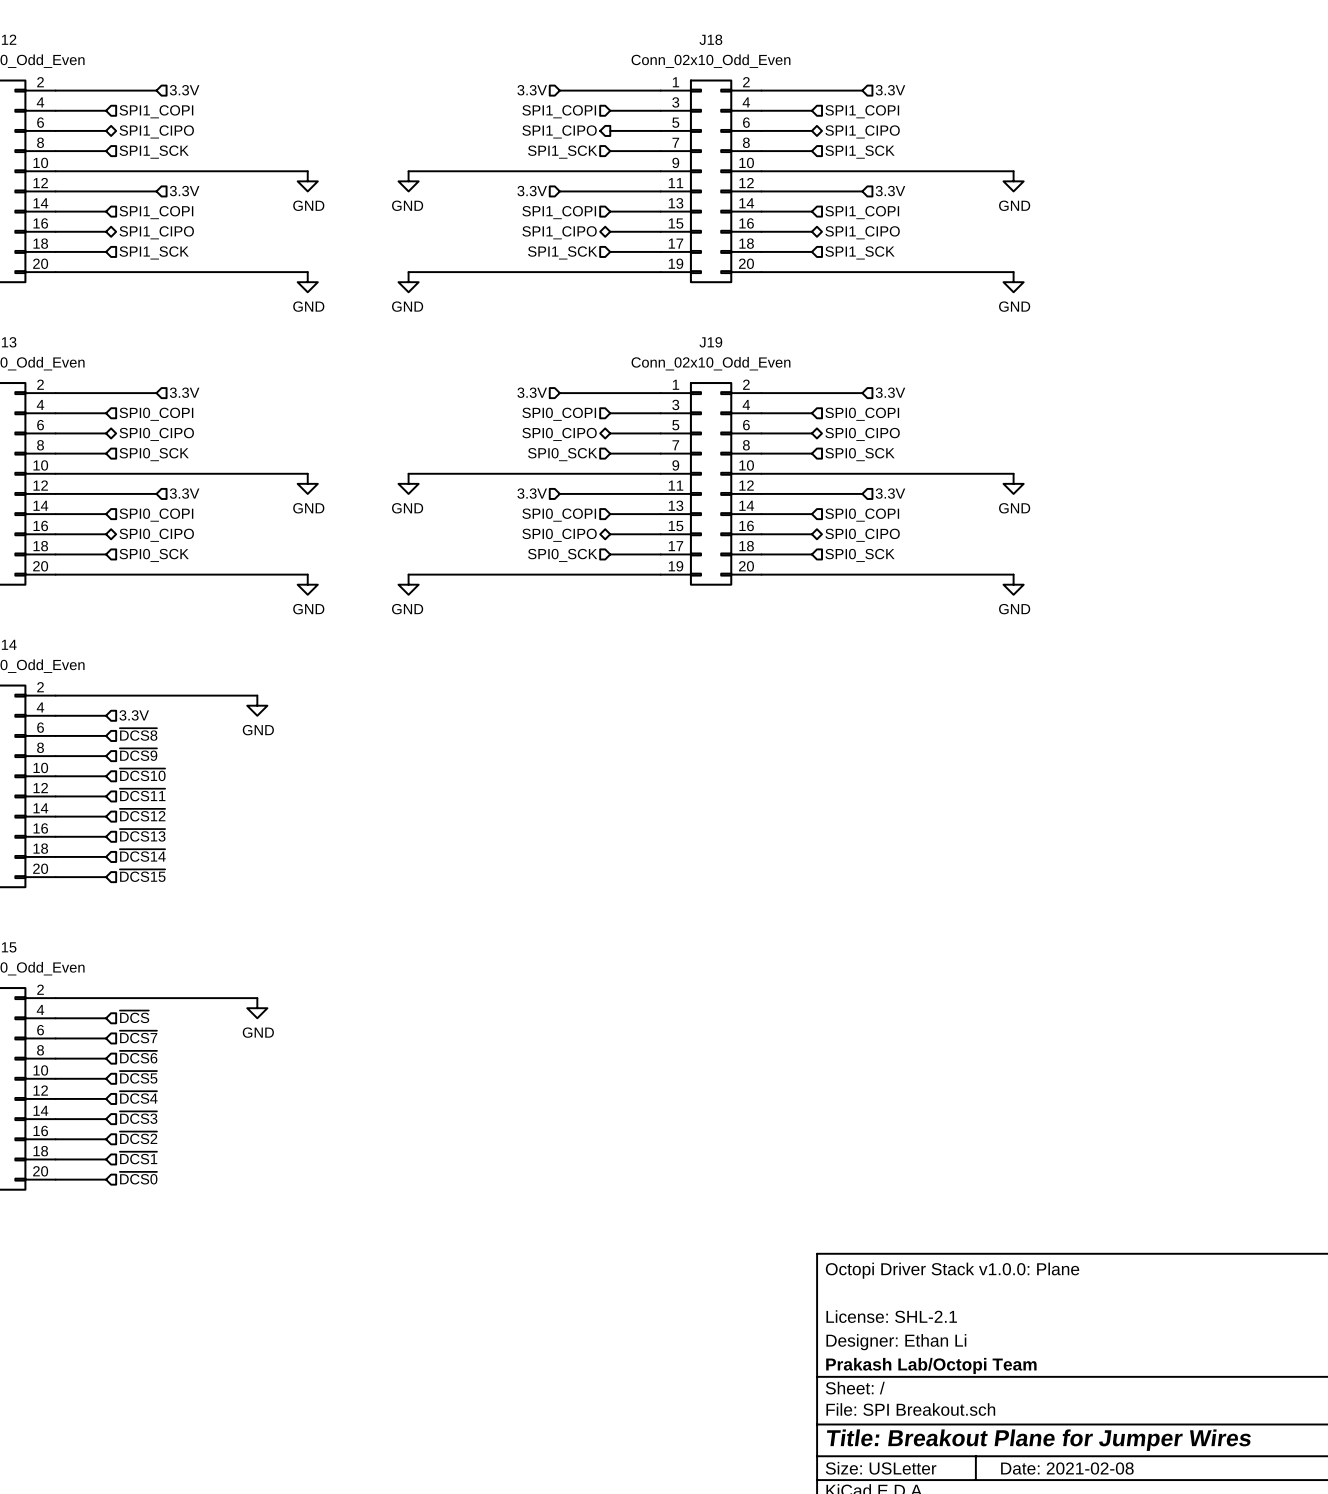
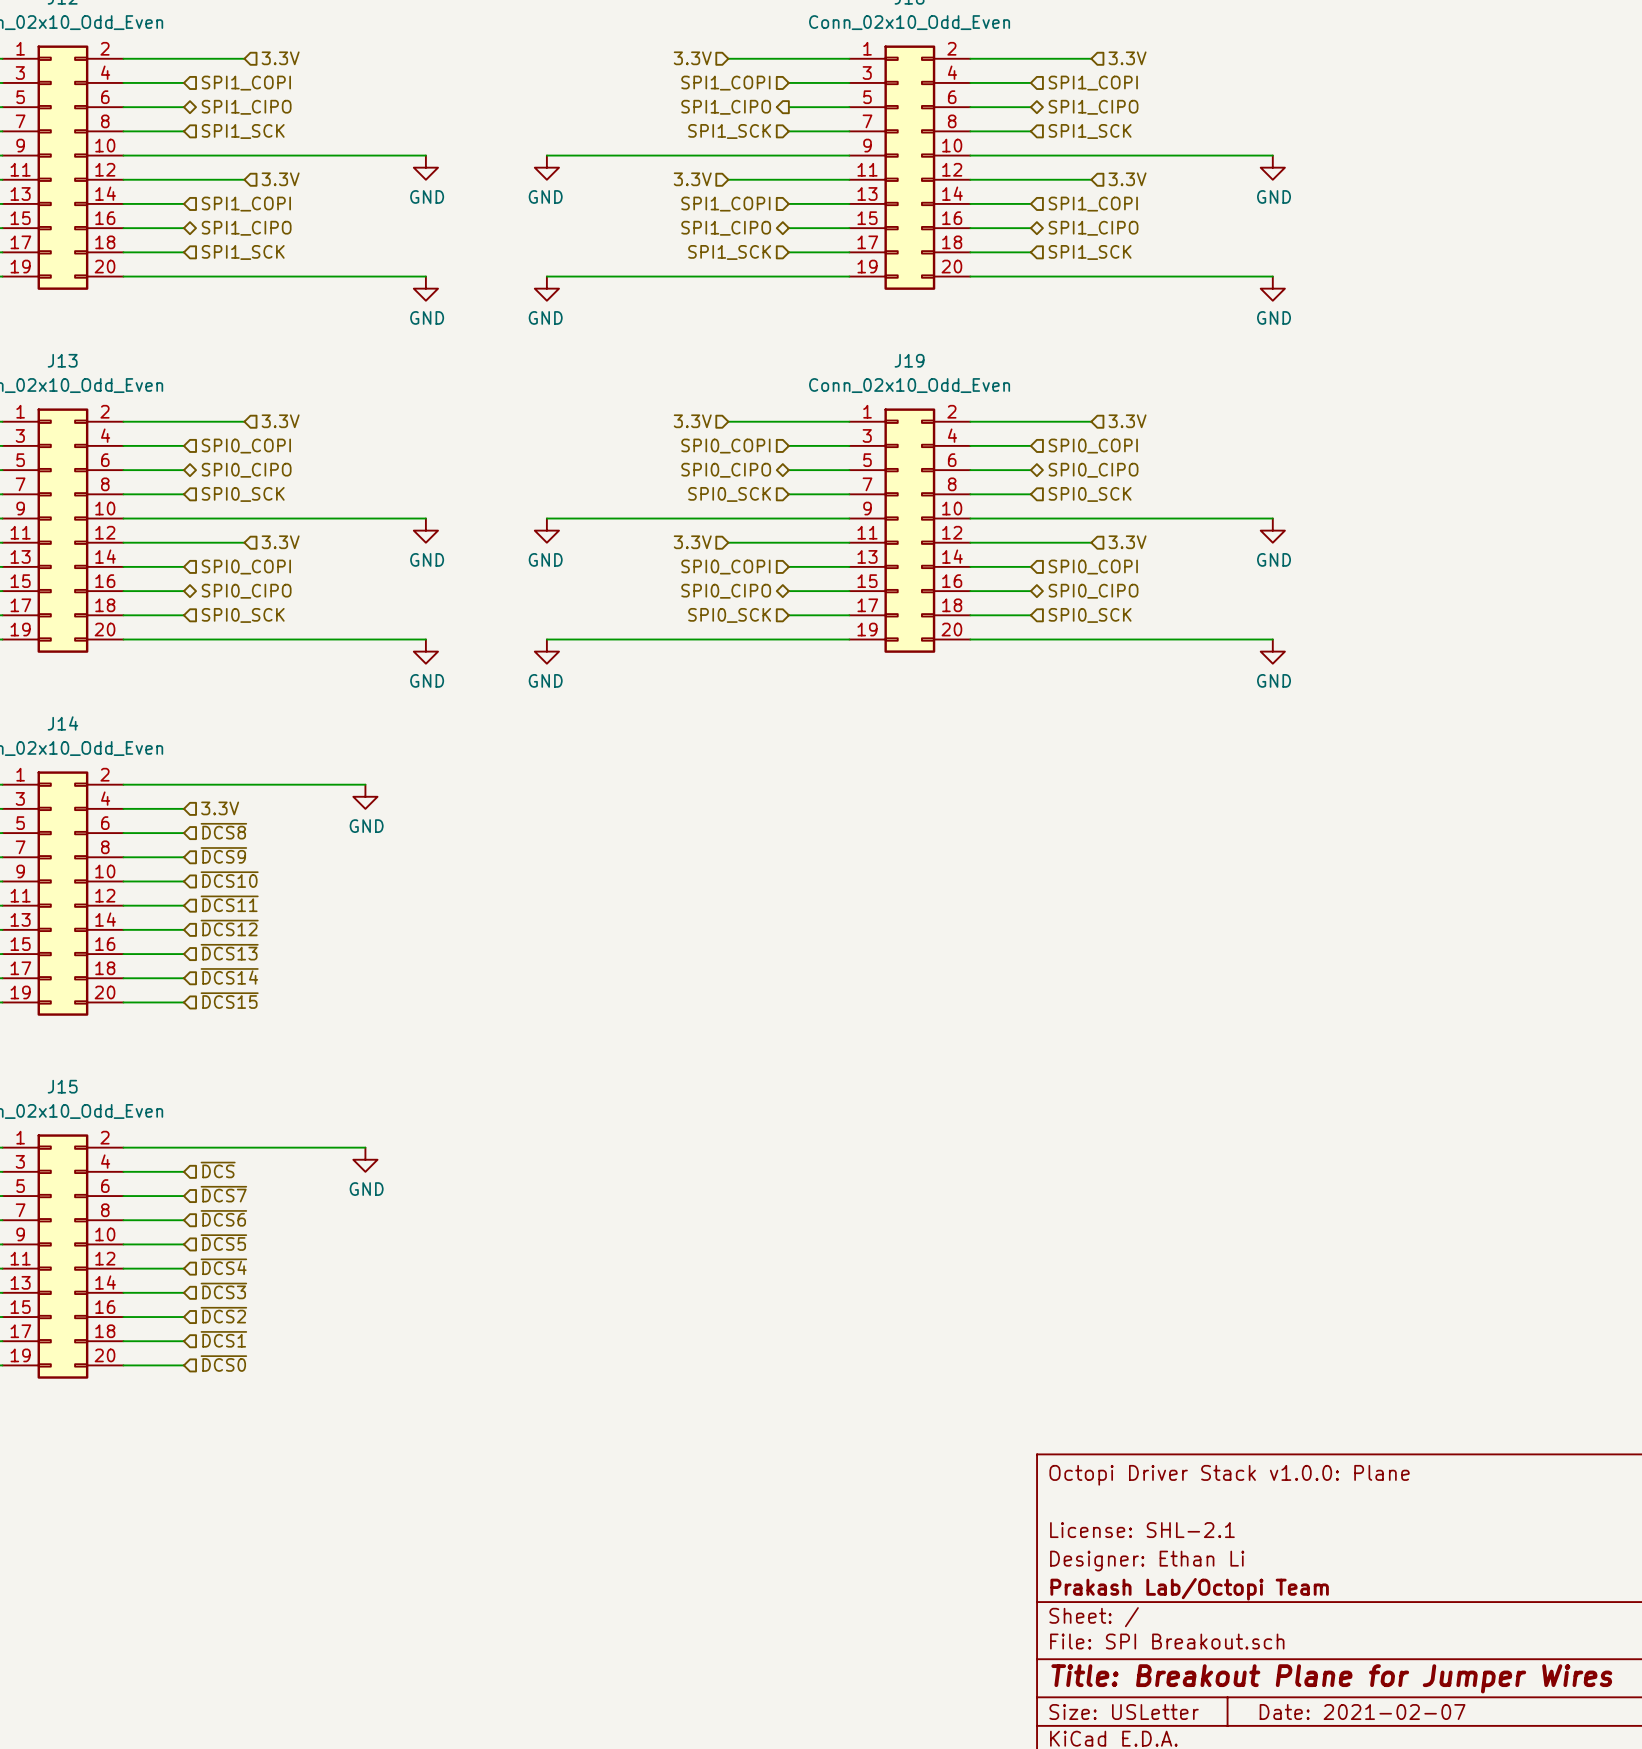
title block: Date: 2021-02-08 (1067, 1468) -> Date: 2021-02-07 (1362, 1712)

